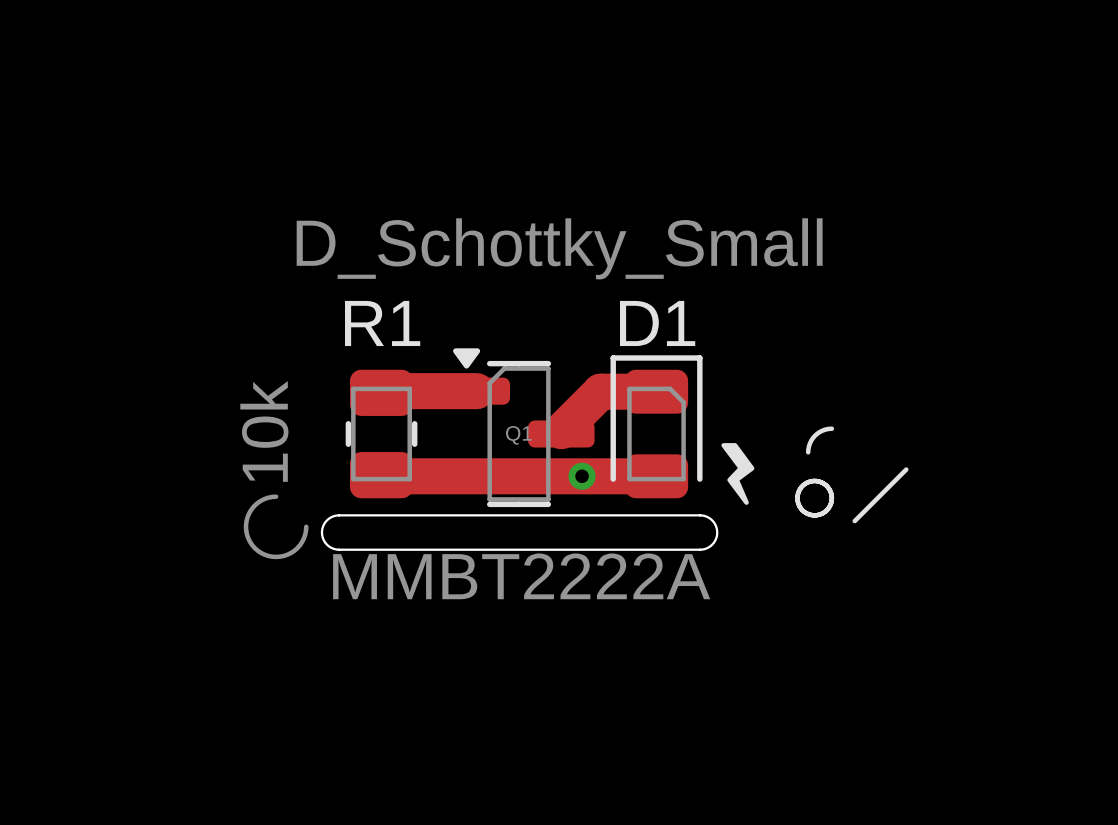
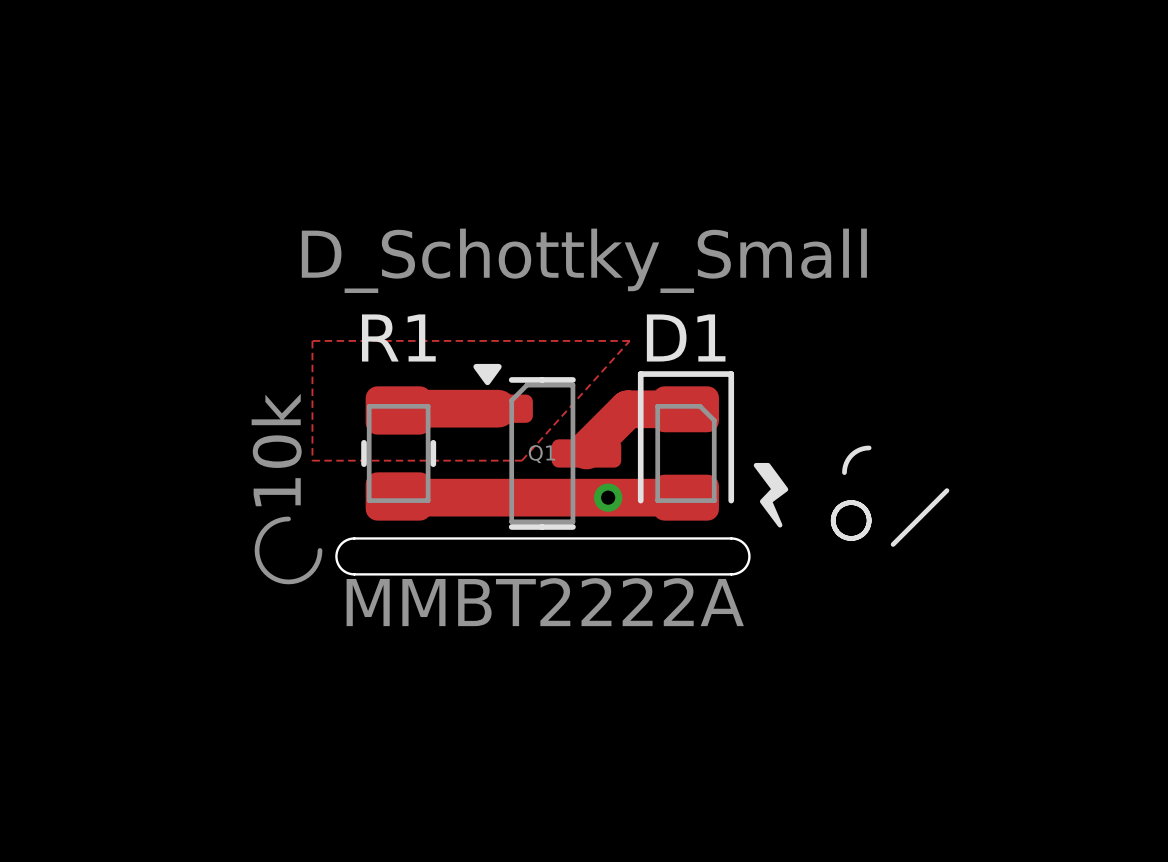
top zone outline: none -> (312, 340) (629, 340) (521, 460) (312, 460) (312, 340)

